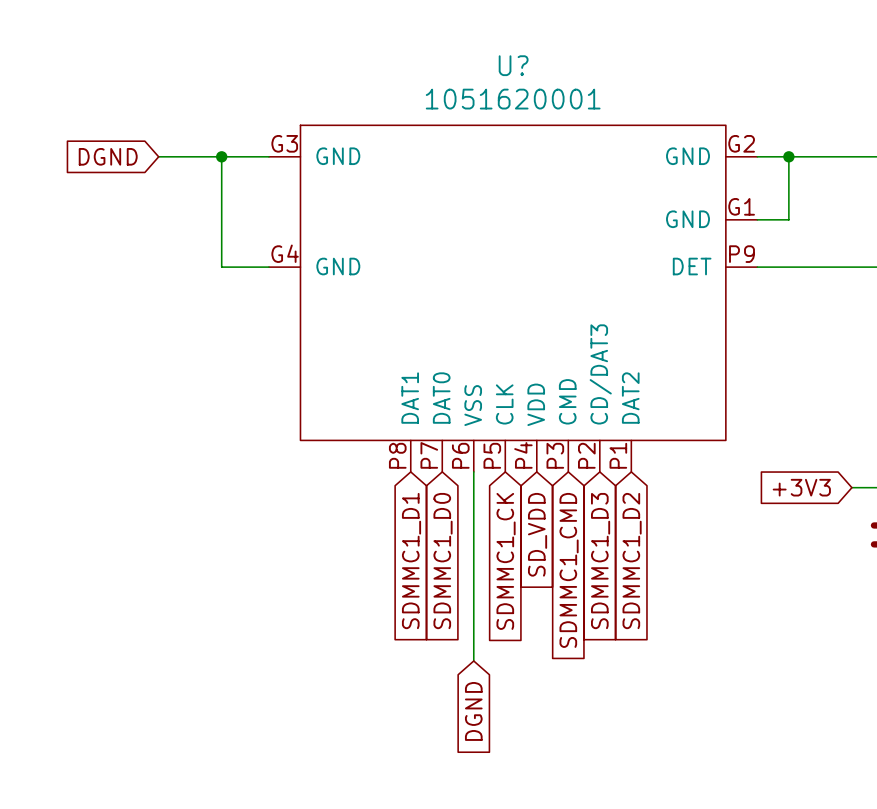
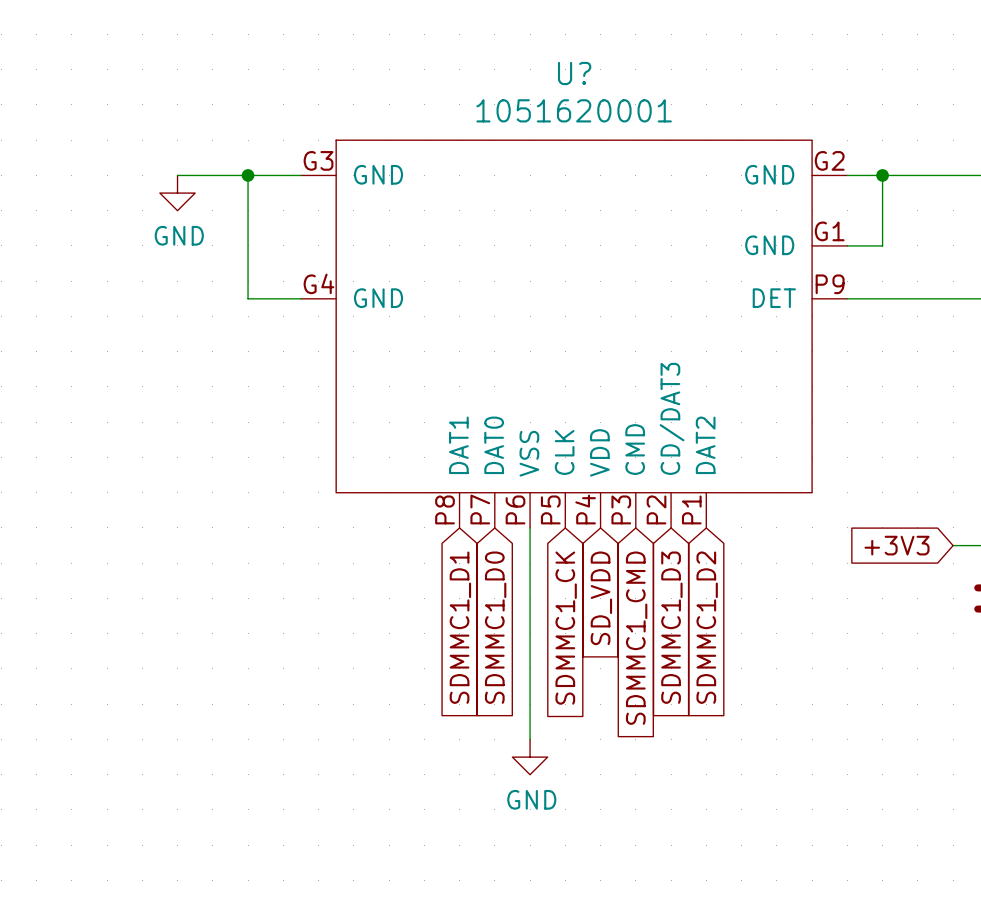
global label: DGND (108, 156) -> none
power symbol: none -> GND (177, 193)
power symbol: none -> GND (530, 757)
global label: DGND (473, 711) -> none

